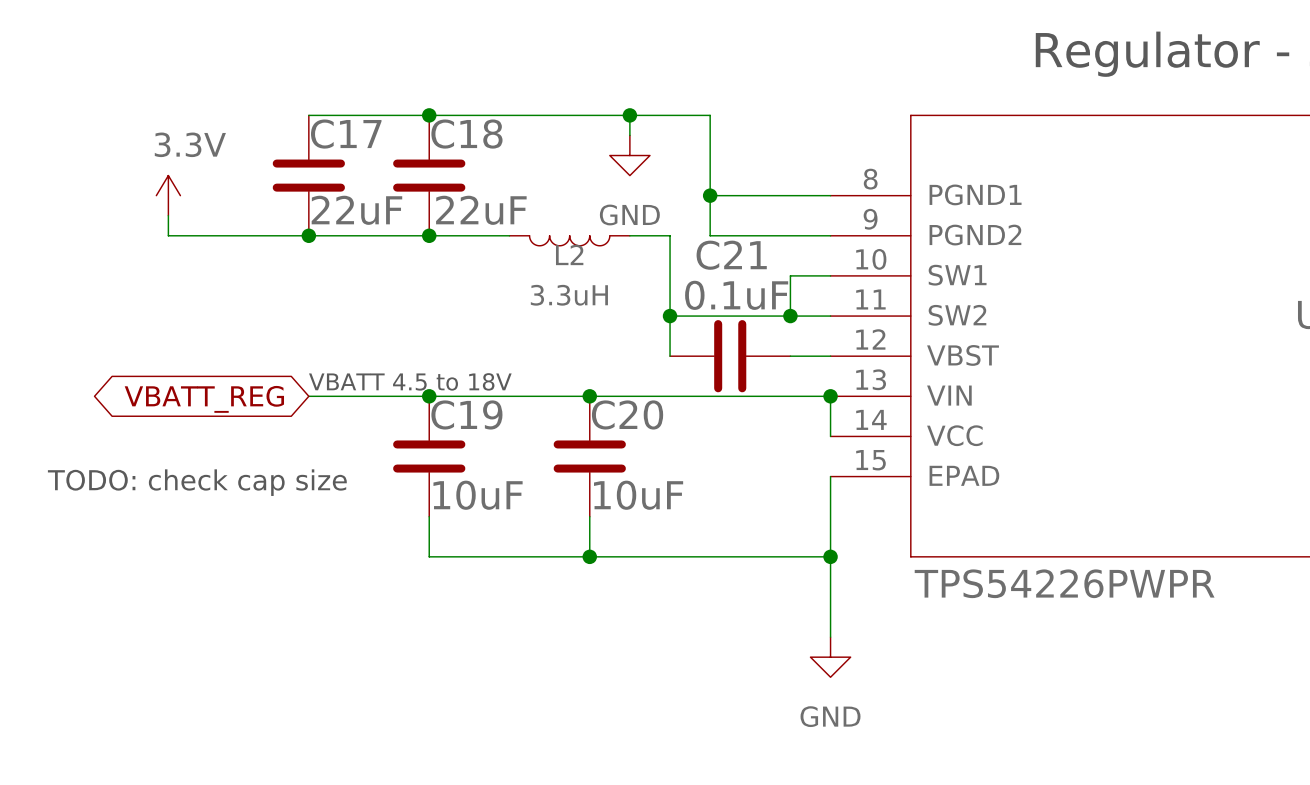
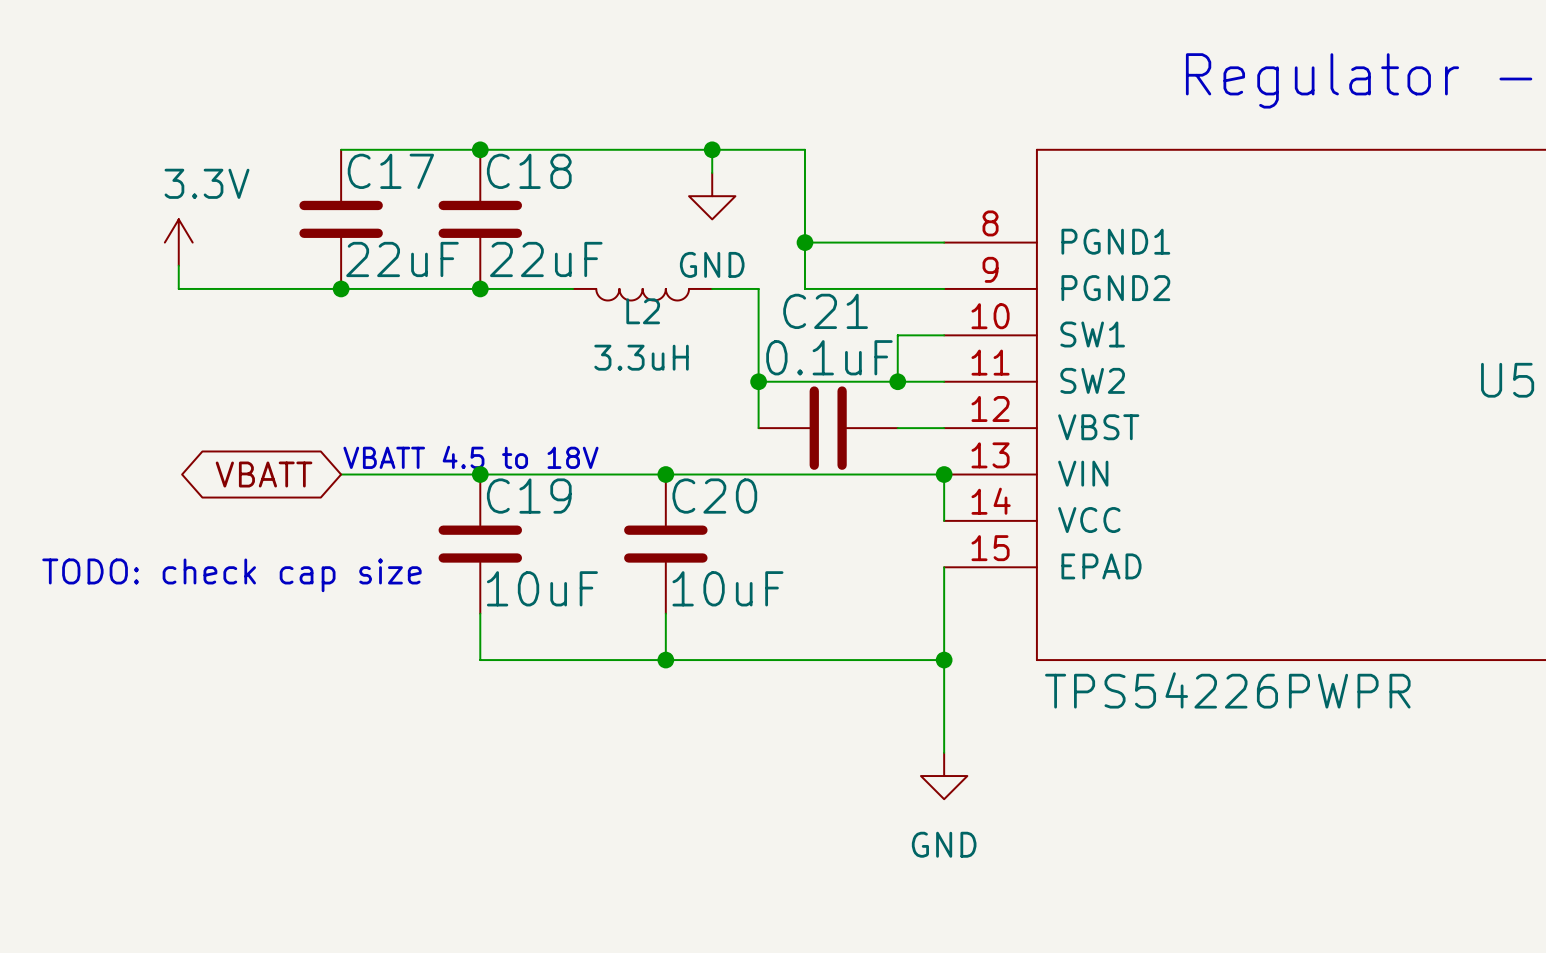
global label: VBATT_REG (204, 399) -> VBATT (264, 474)

